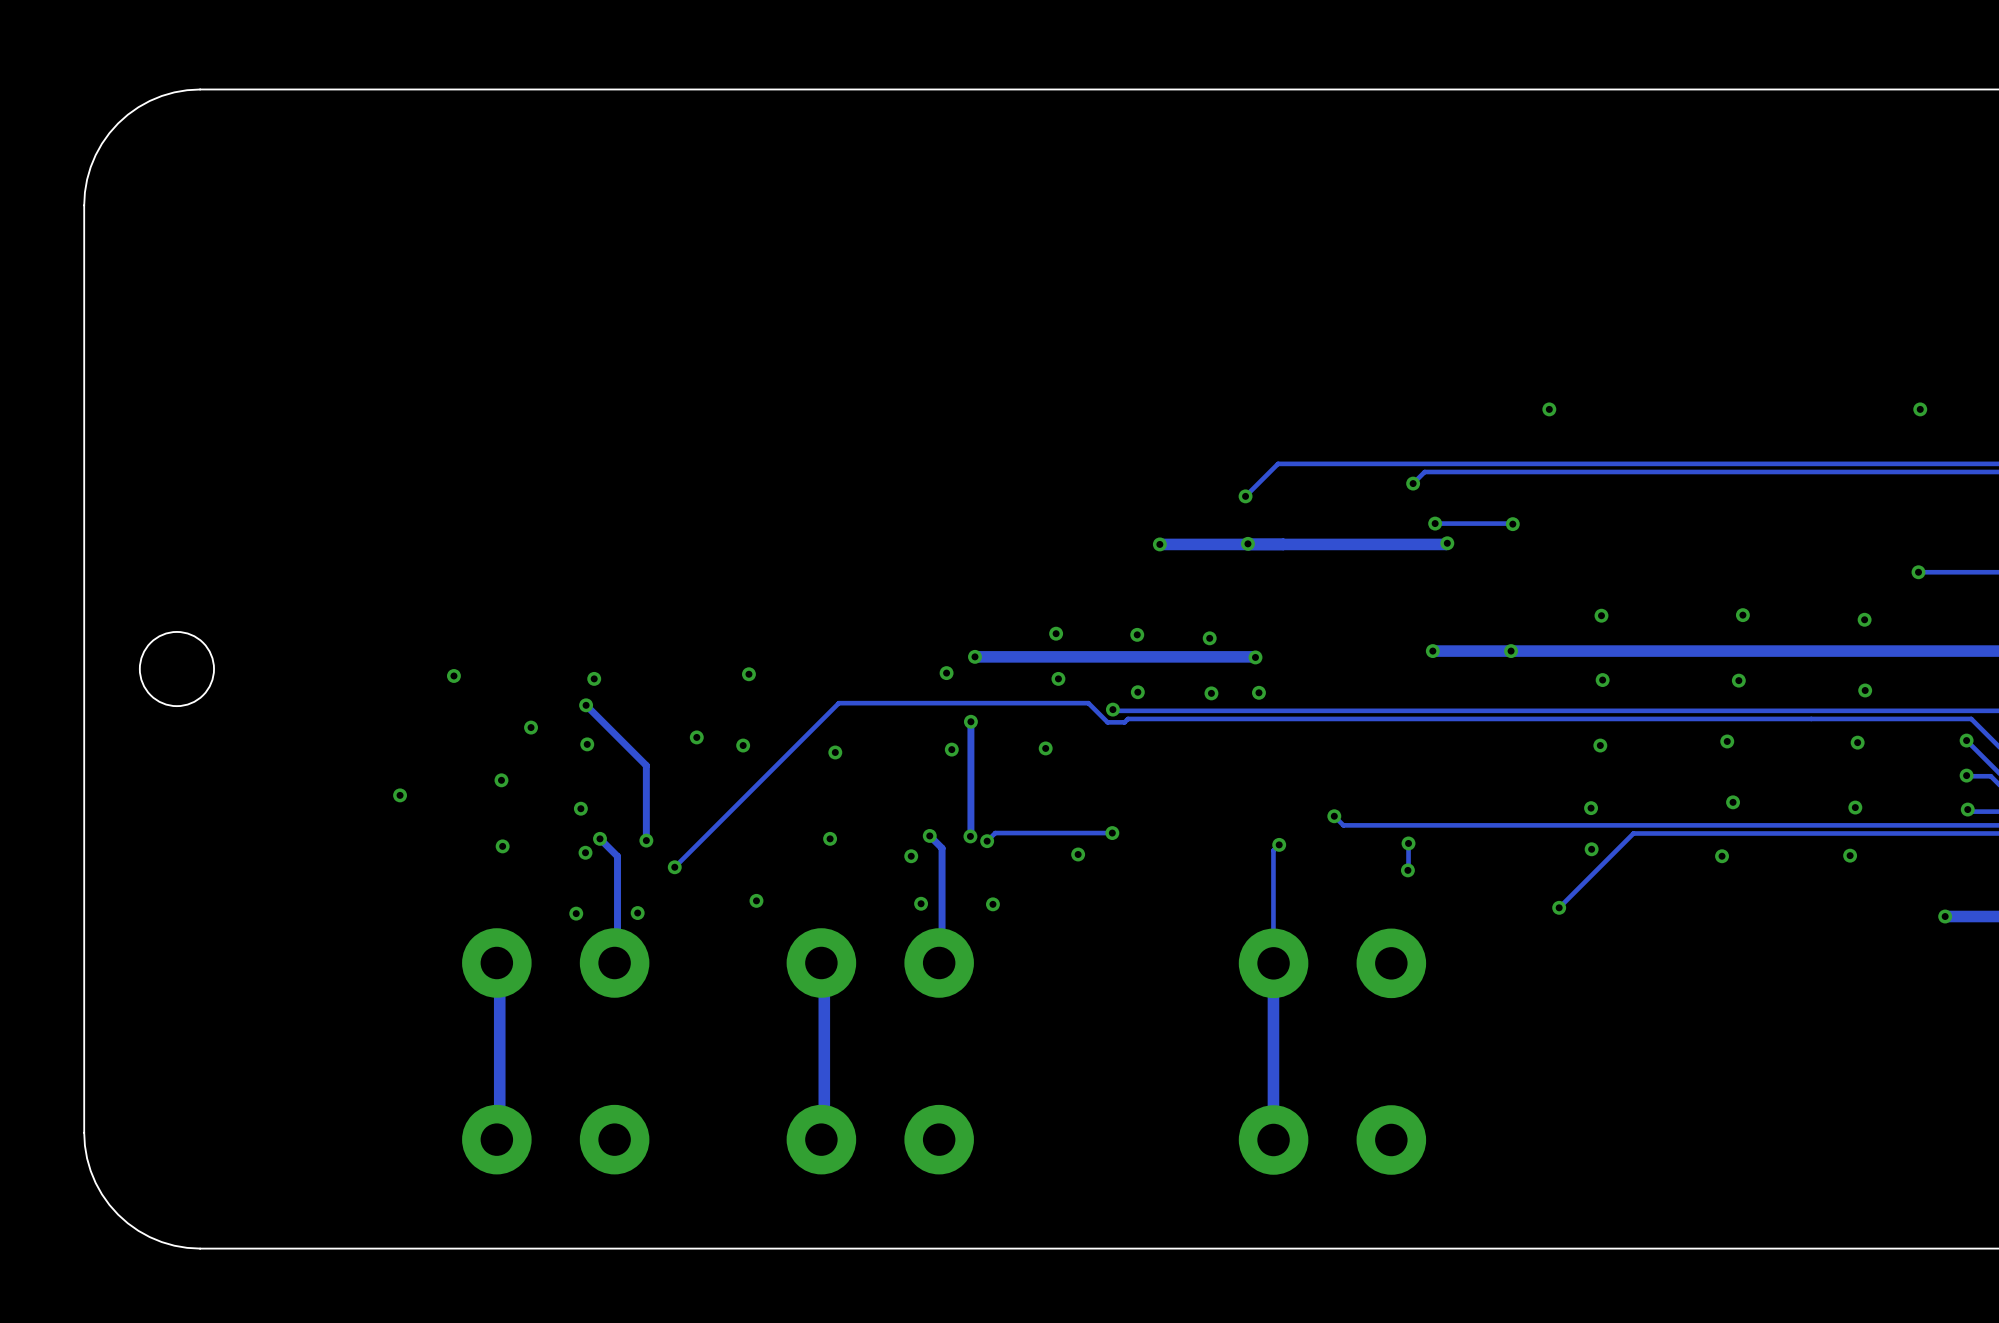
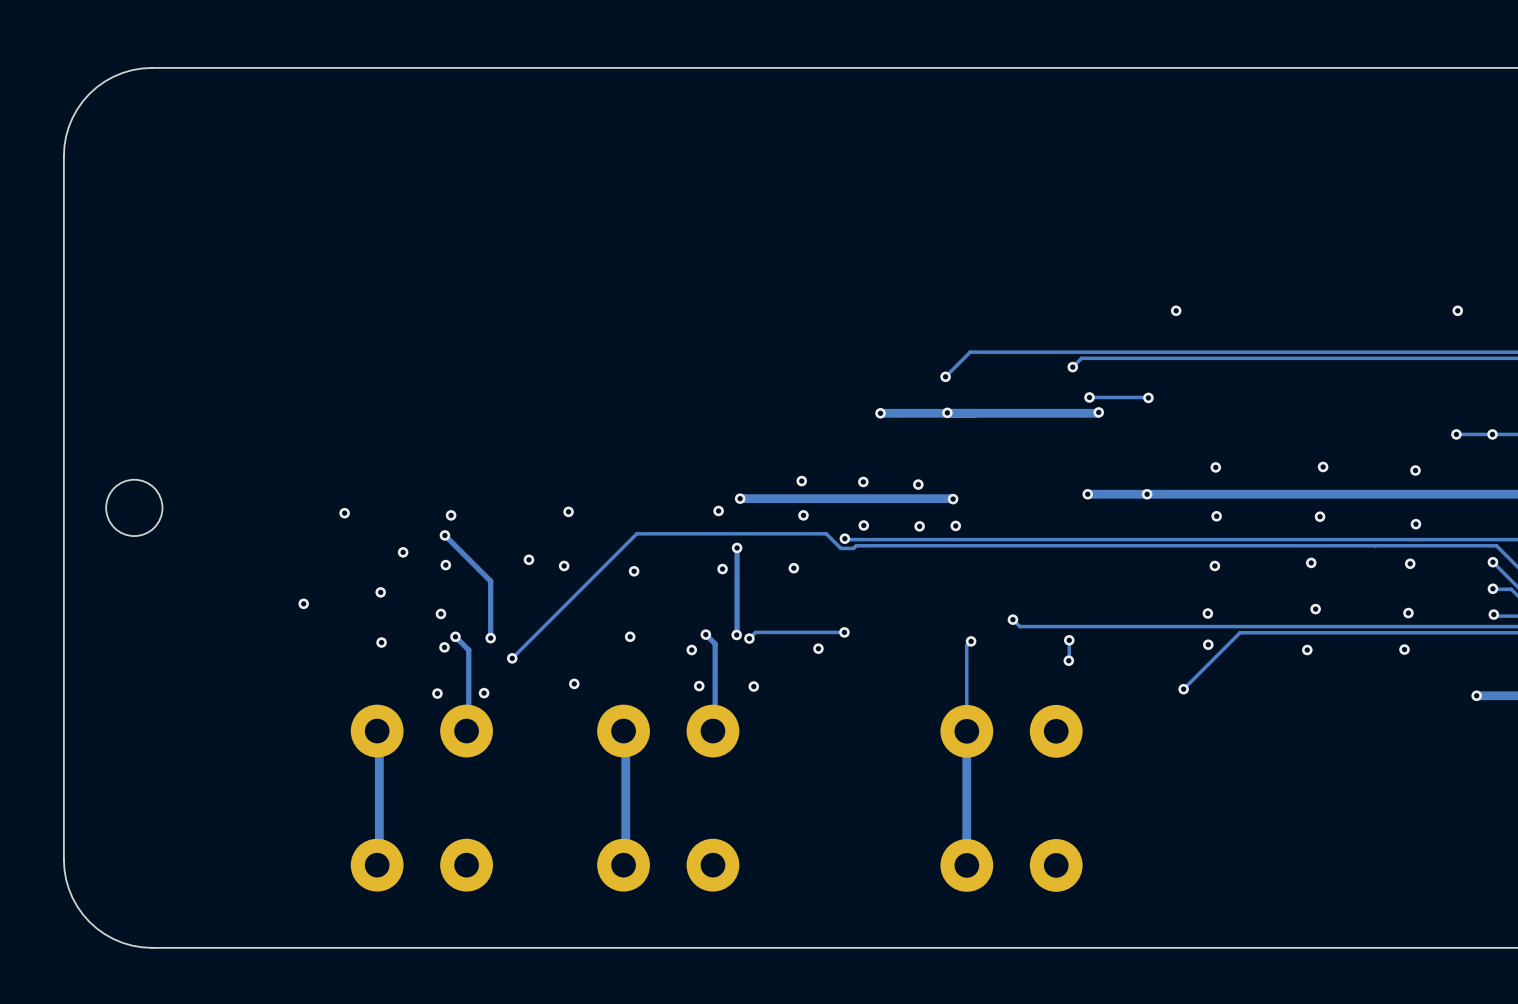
via: none -> (1492, 434)

